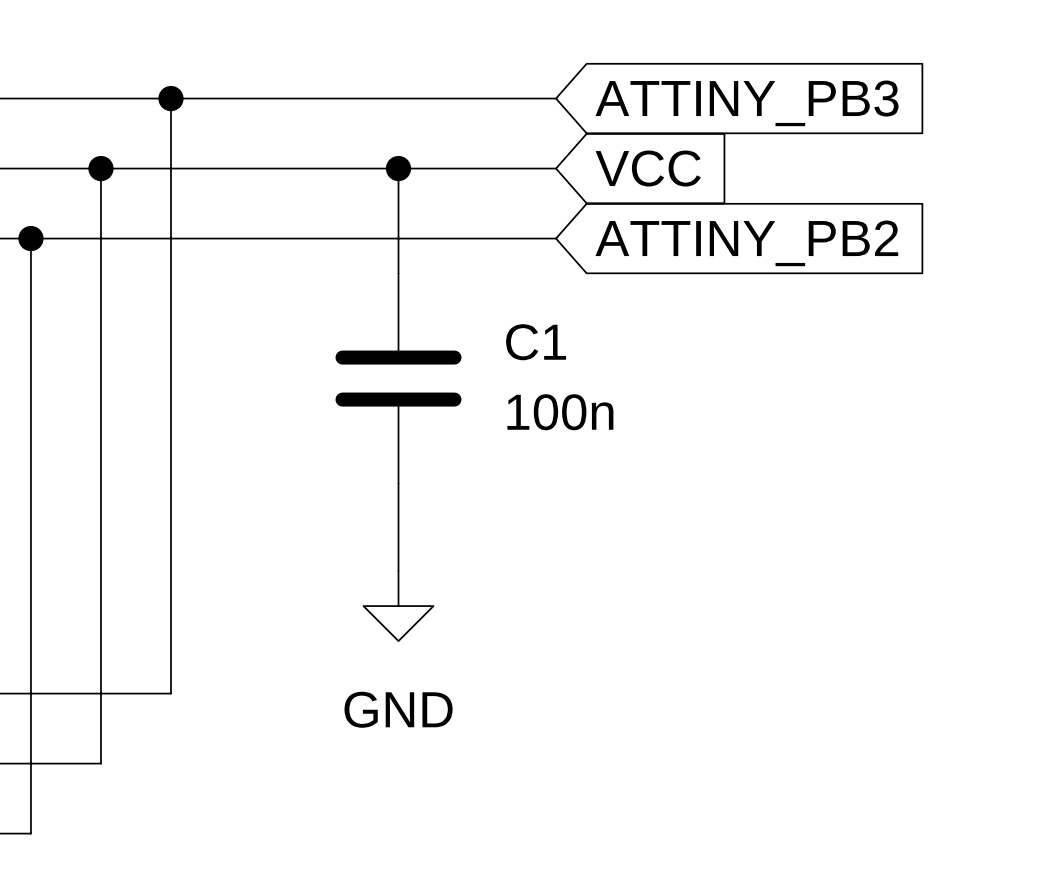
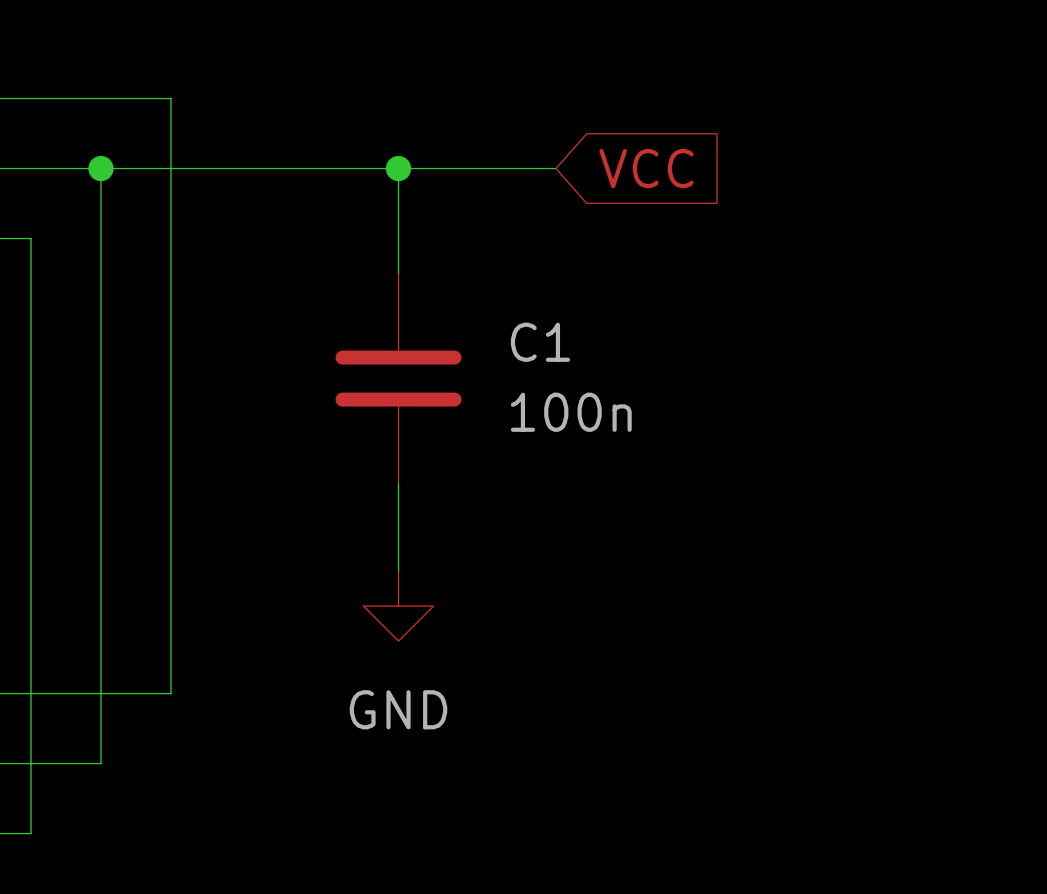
wire: (170, 98) (556, 98) -> none
junction: (170, 98) -> none
global label: ATTINY_PB3 (747, 103) -> none
wire: (30, 238) (556, 238) -> none
junction: (30, 238) -> none
global label: ATTINY_PB2 (746, 243) -> none

